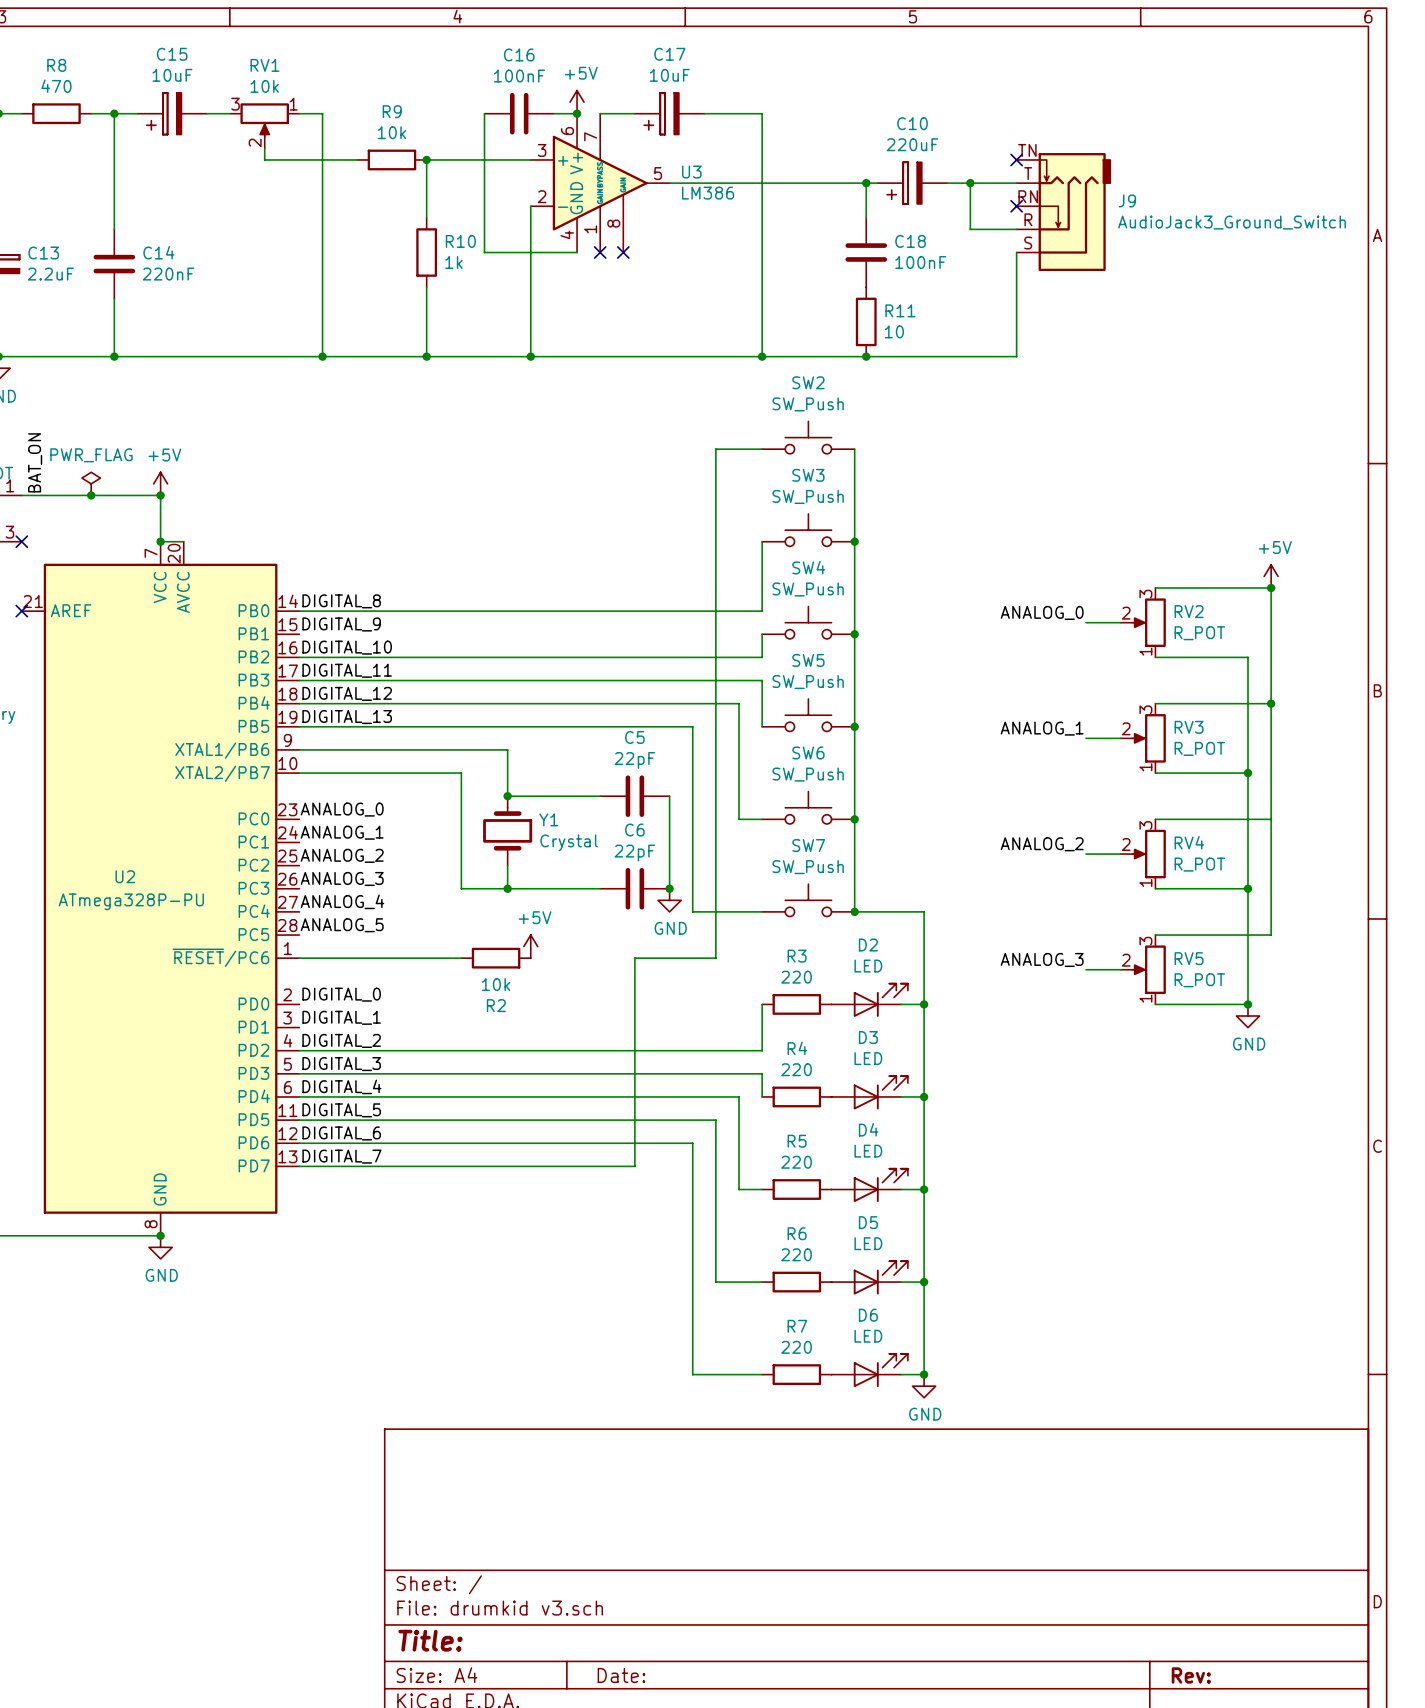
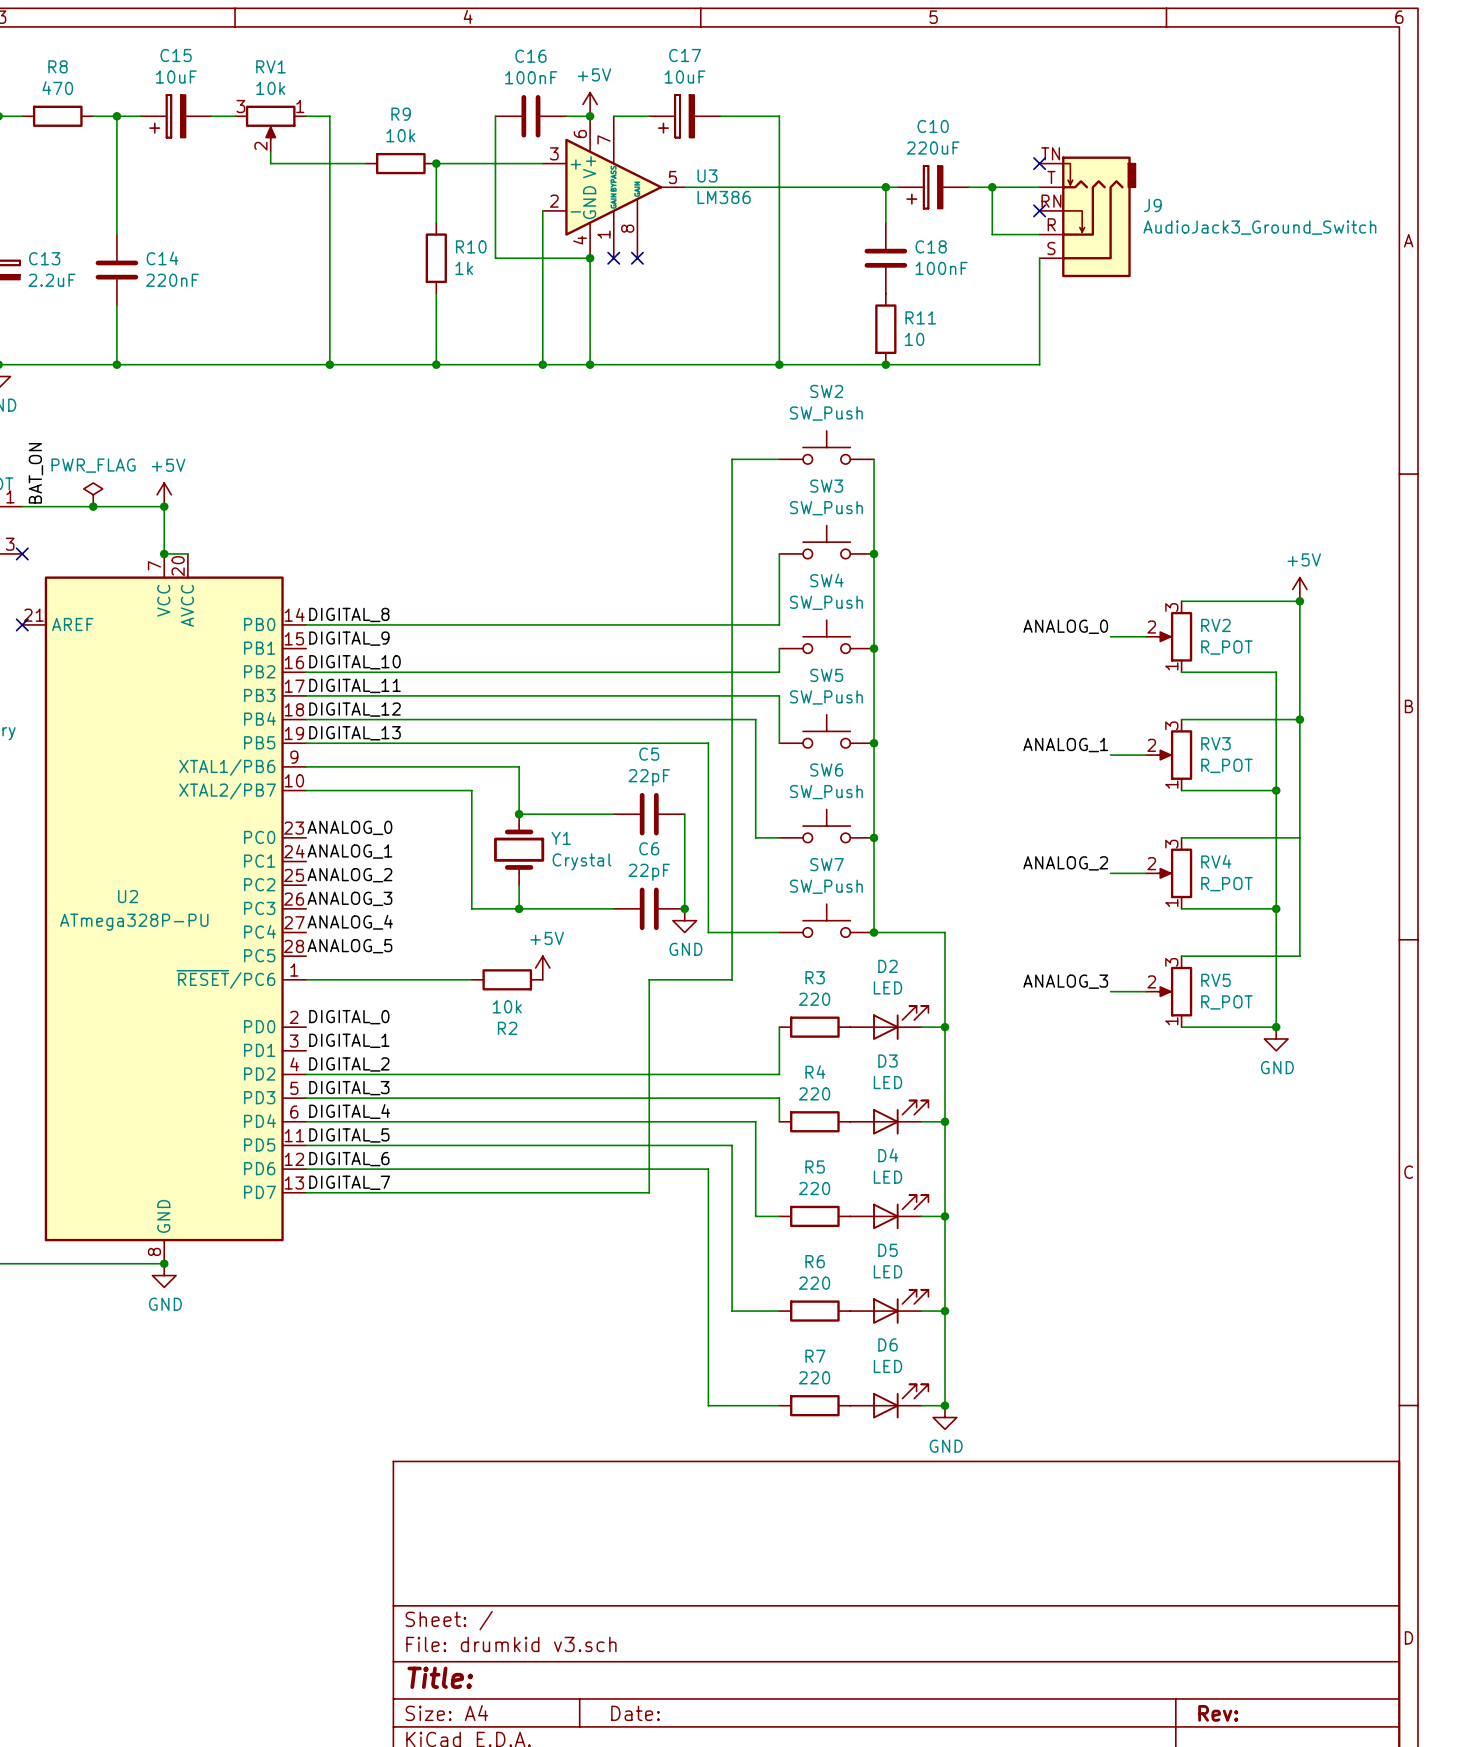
wire: none -> (590, 258) (590, 364)
junction: none -> (590, 258)
junction: none -> (590, 364)

